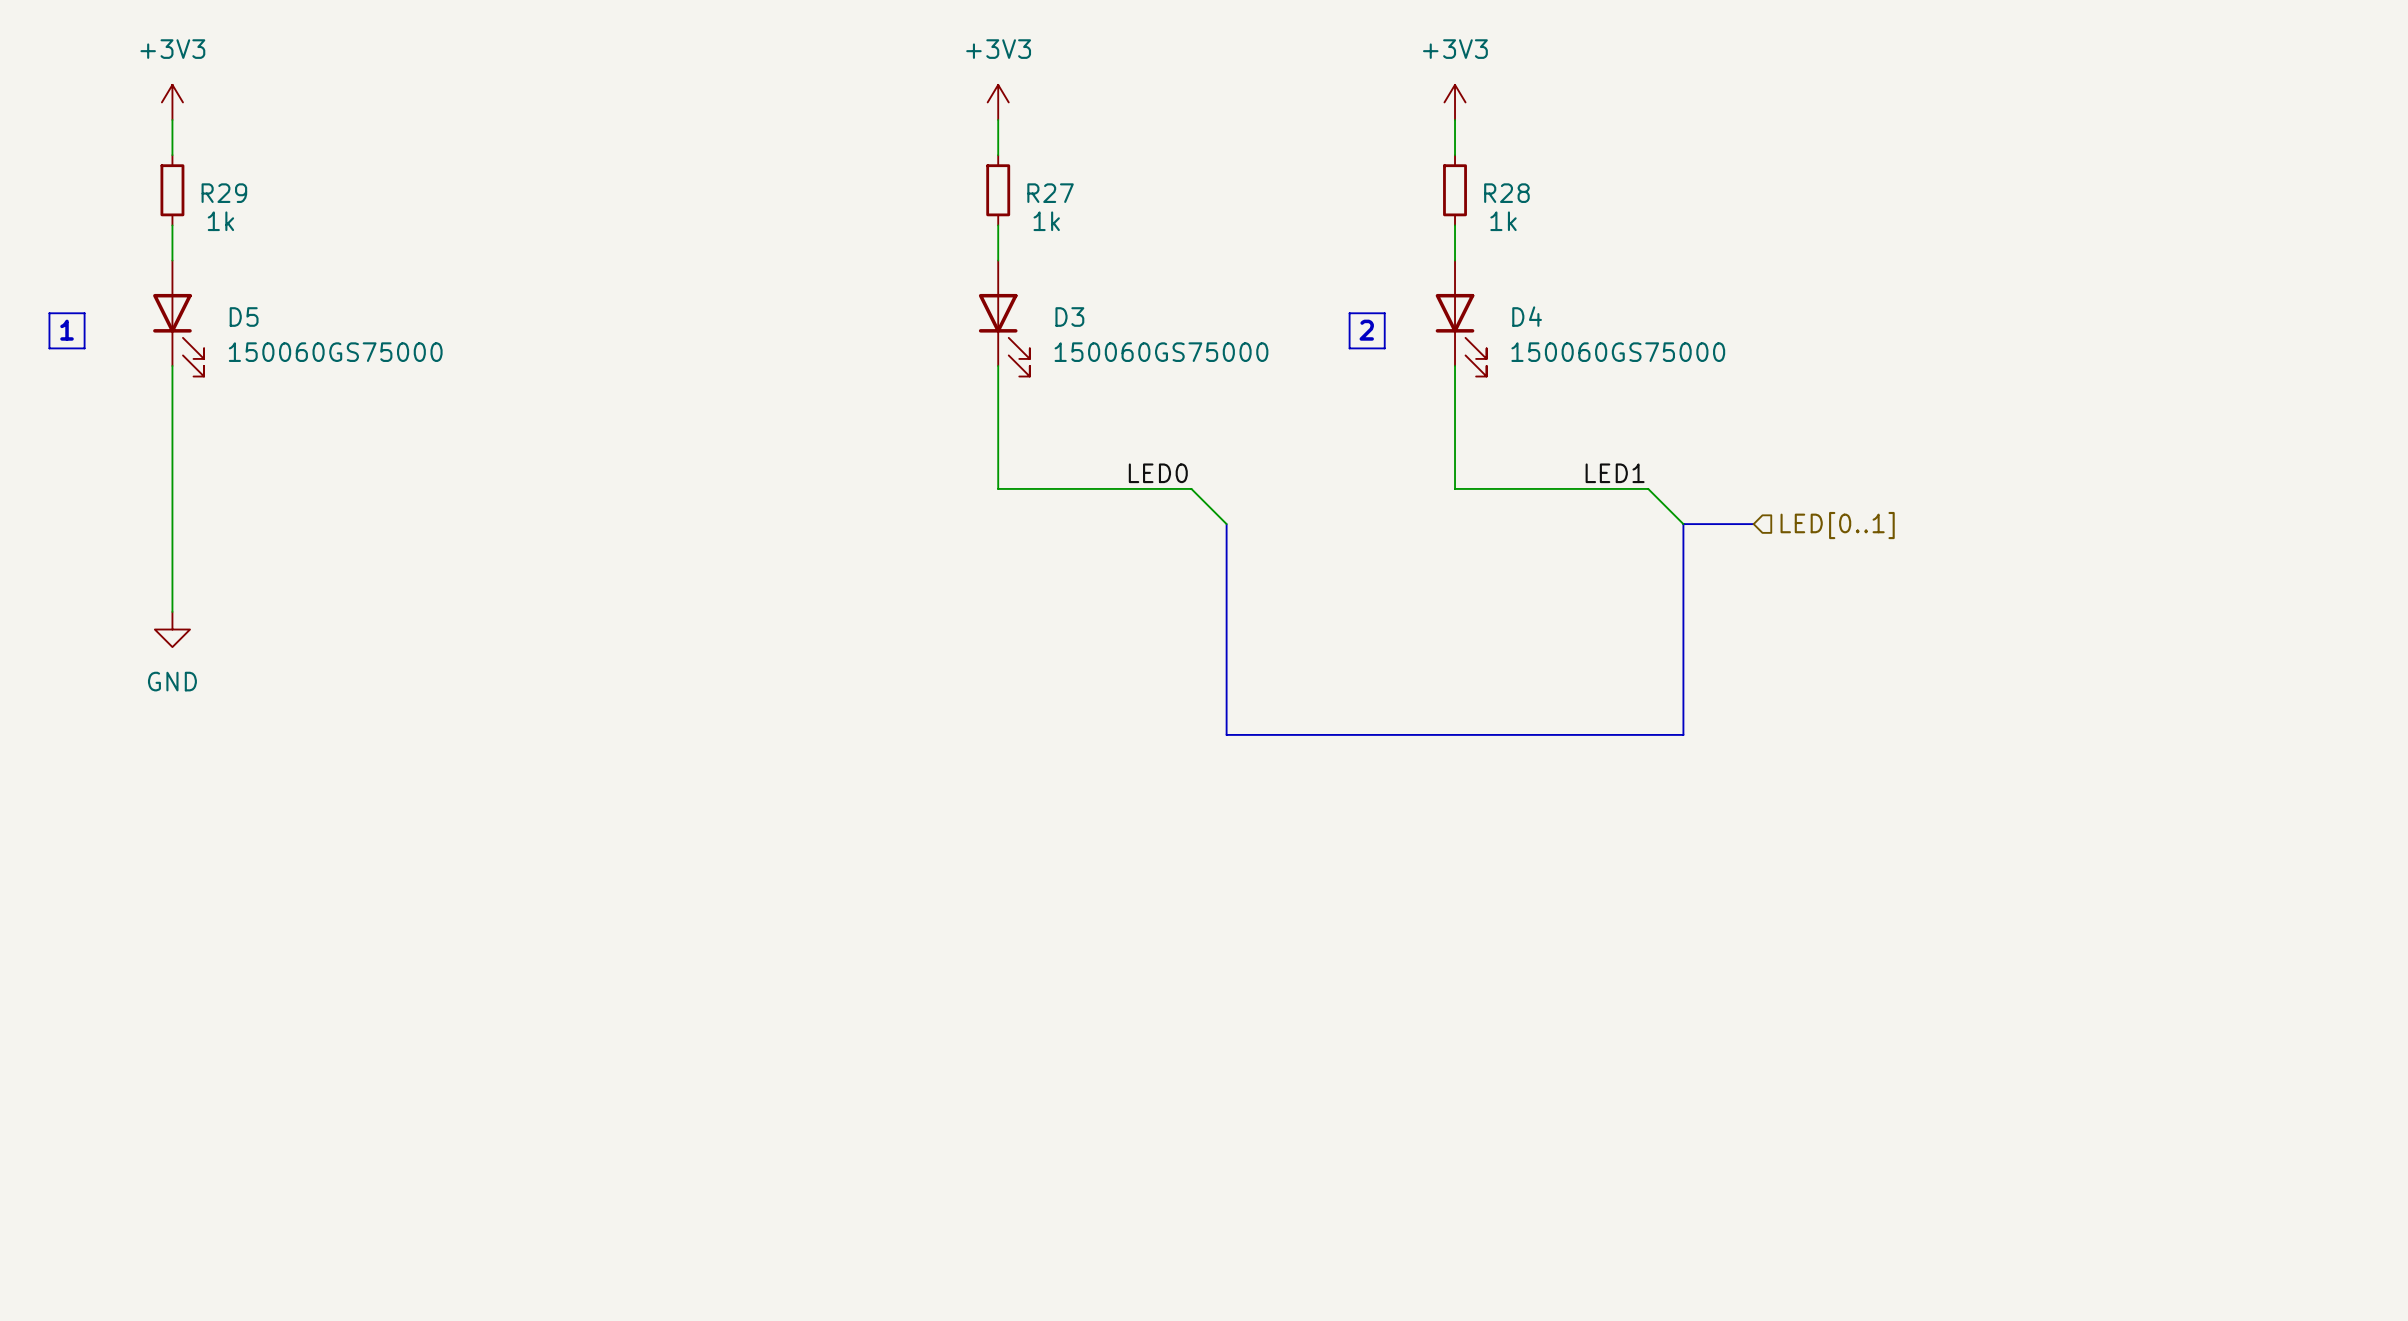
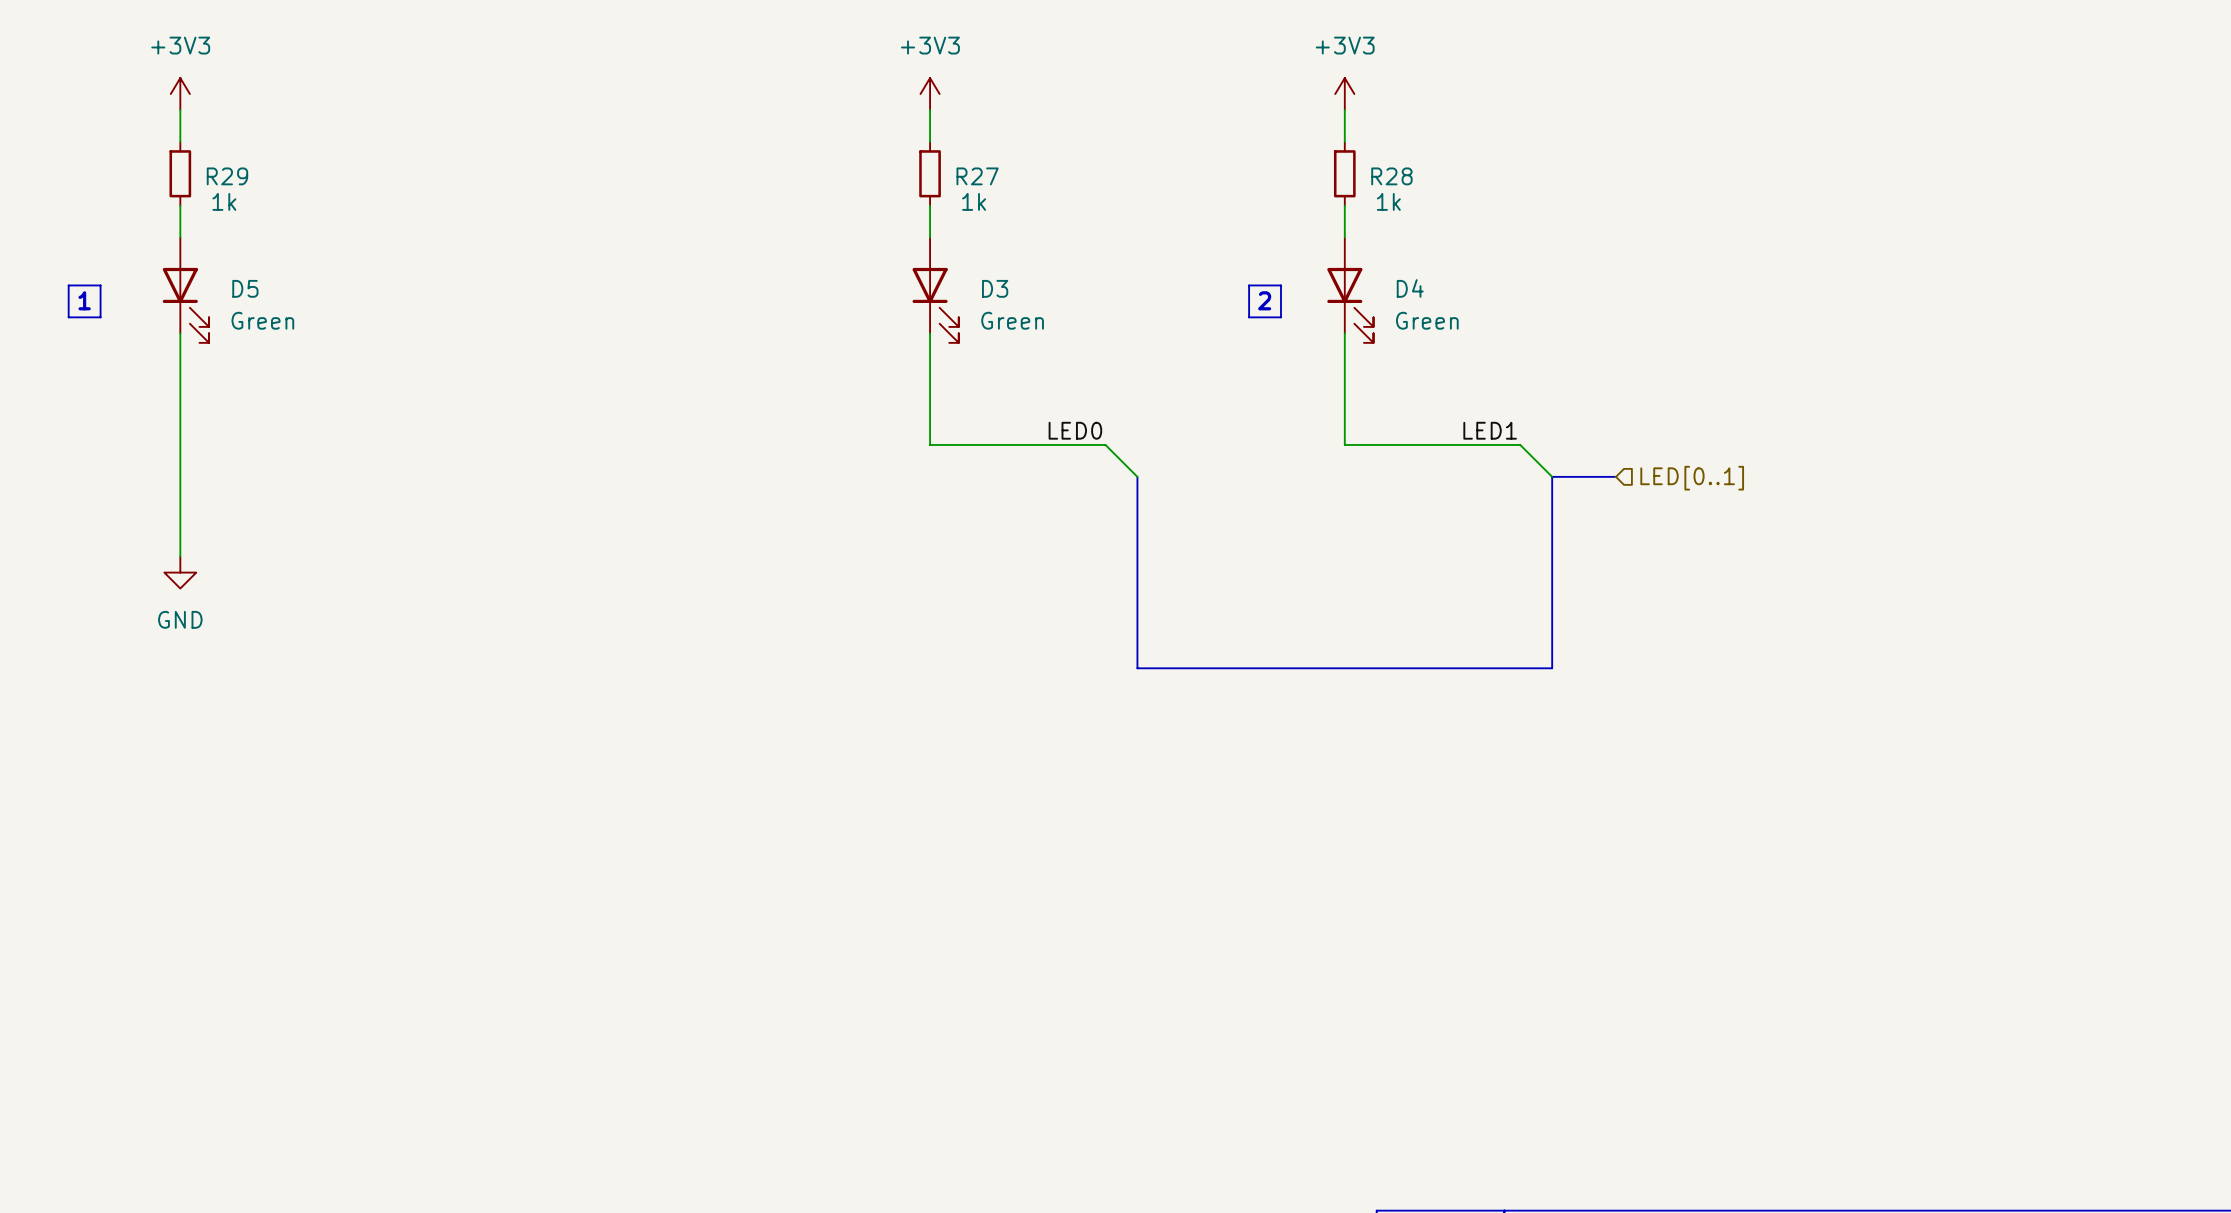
D5 value: 150060GS75000 (335, 352) -> Green (262, 320)
D3 value: 150060GS75000 (1161, 352) -> Green (1012, 320)
D4 value: 150060GS75000 (1618, 352) -> Green (1427, 320)

